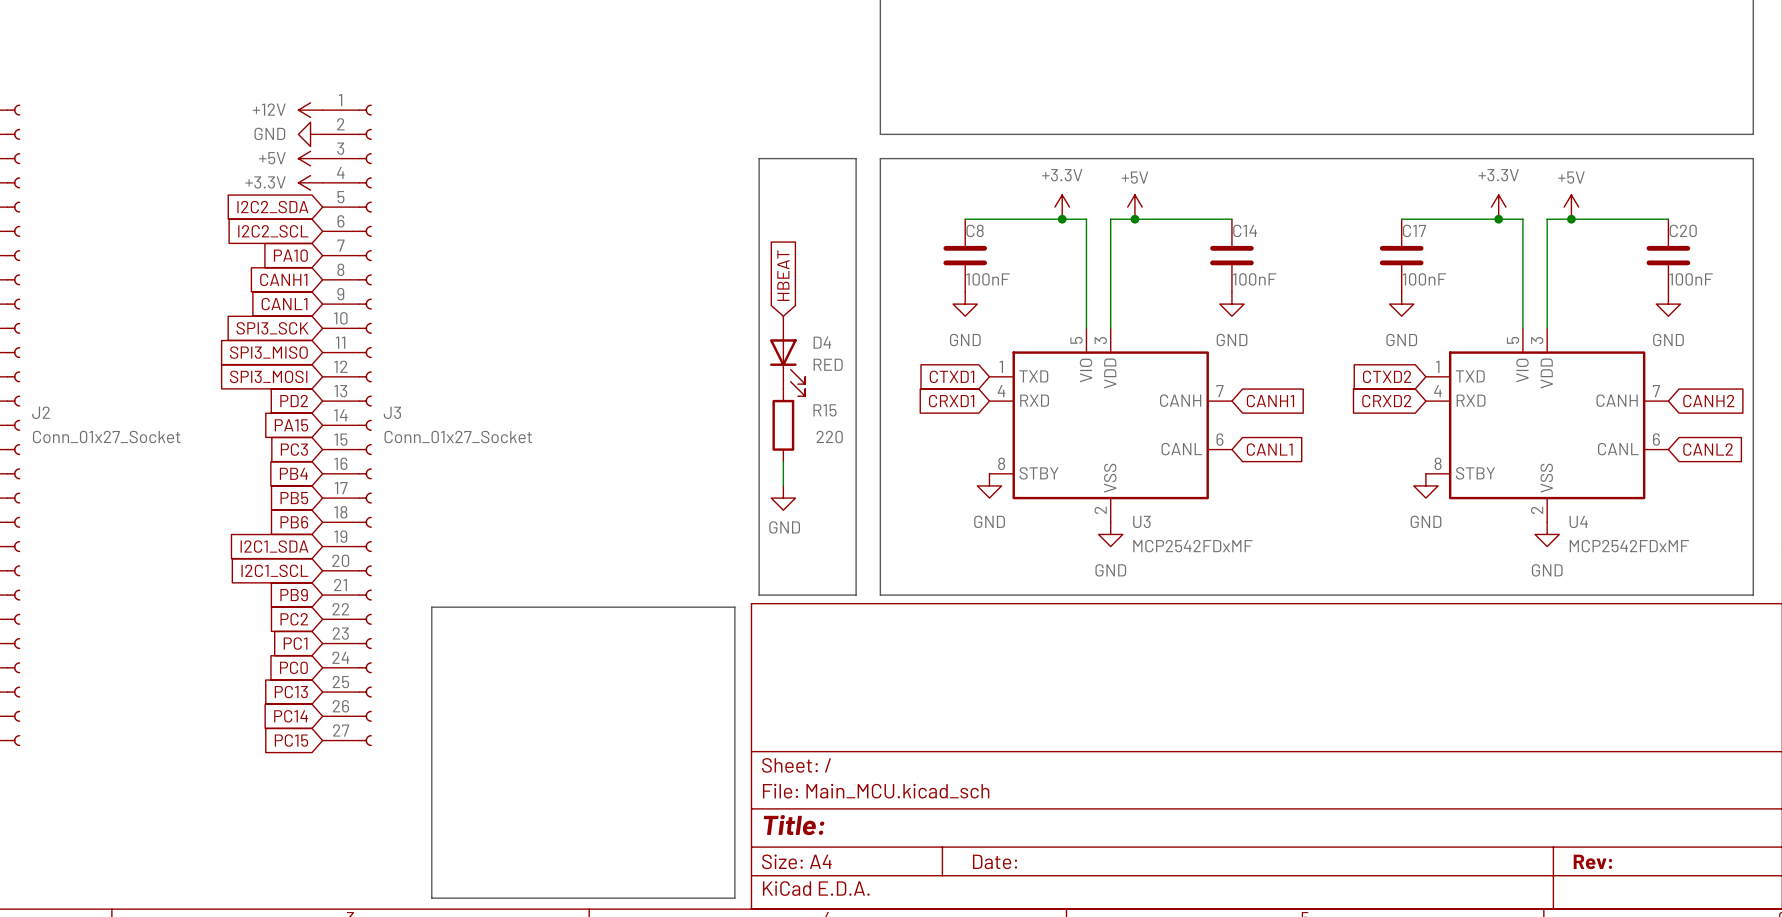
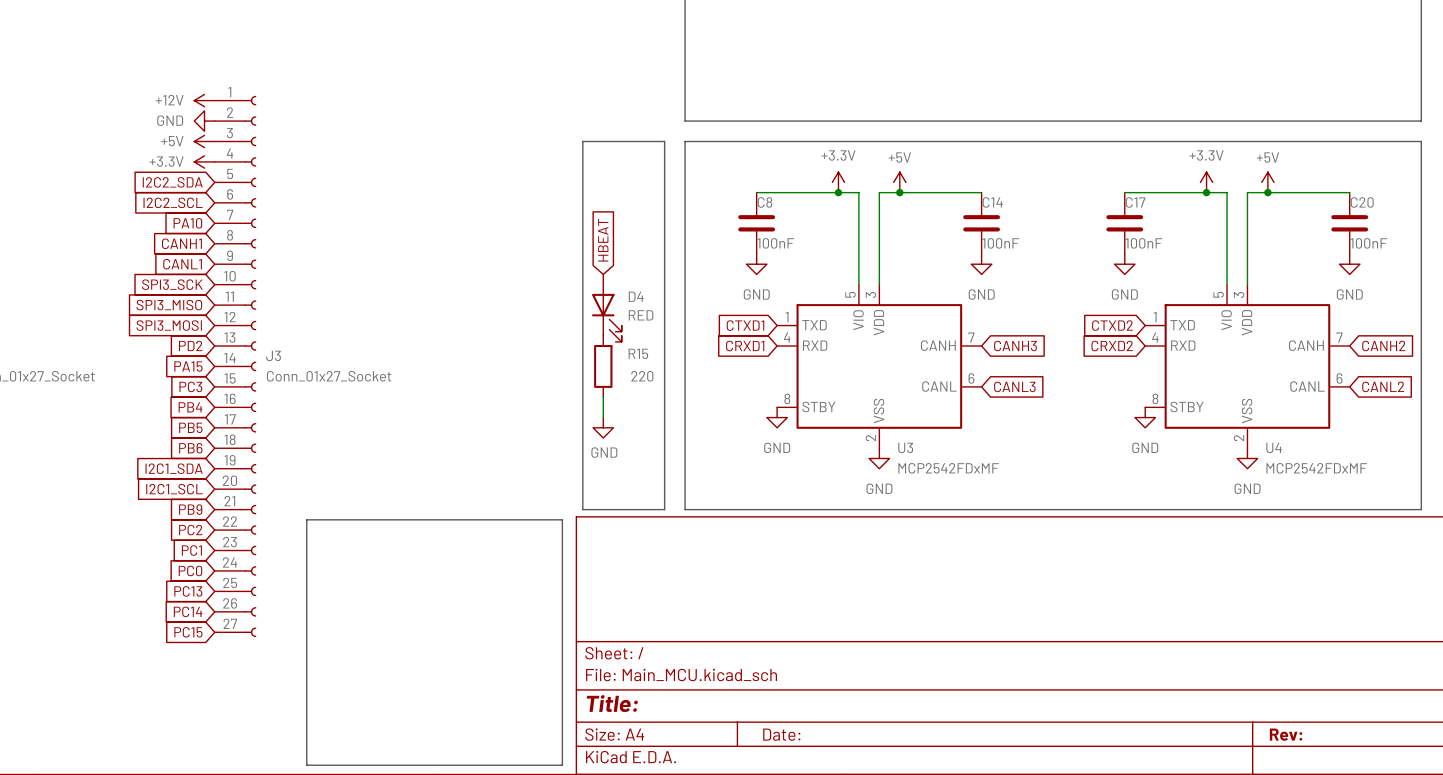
global label: CANH1 (1270, 401) -> CANH3 (1015, 346)
global label: CANL1 (1269, 449) -> CANL3 (1014, 386)

